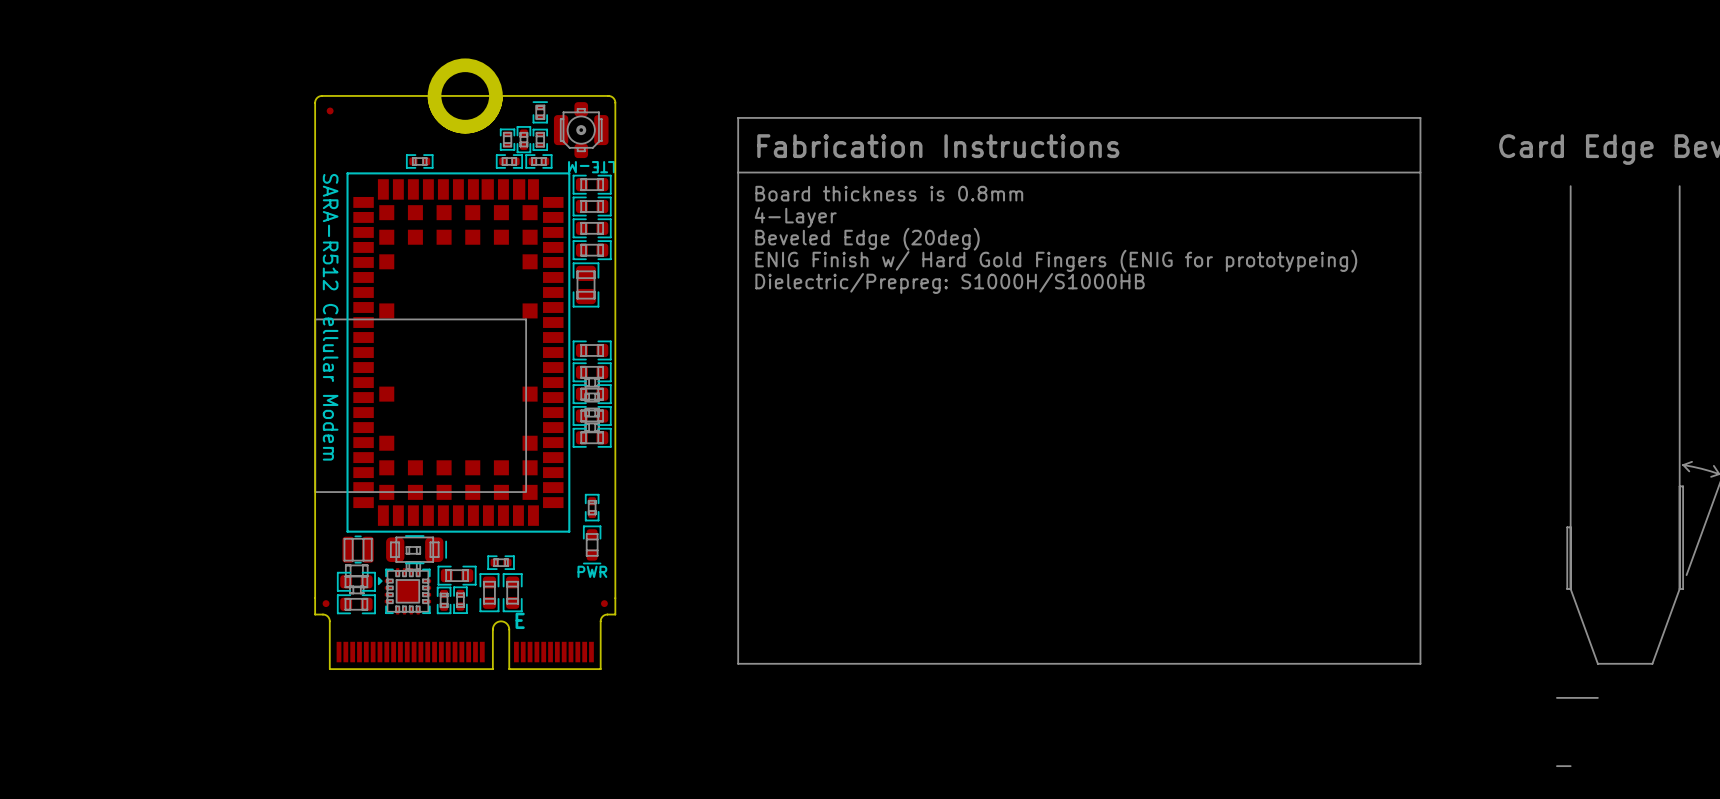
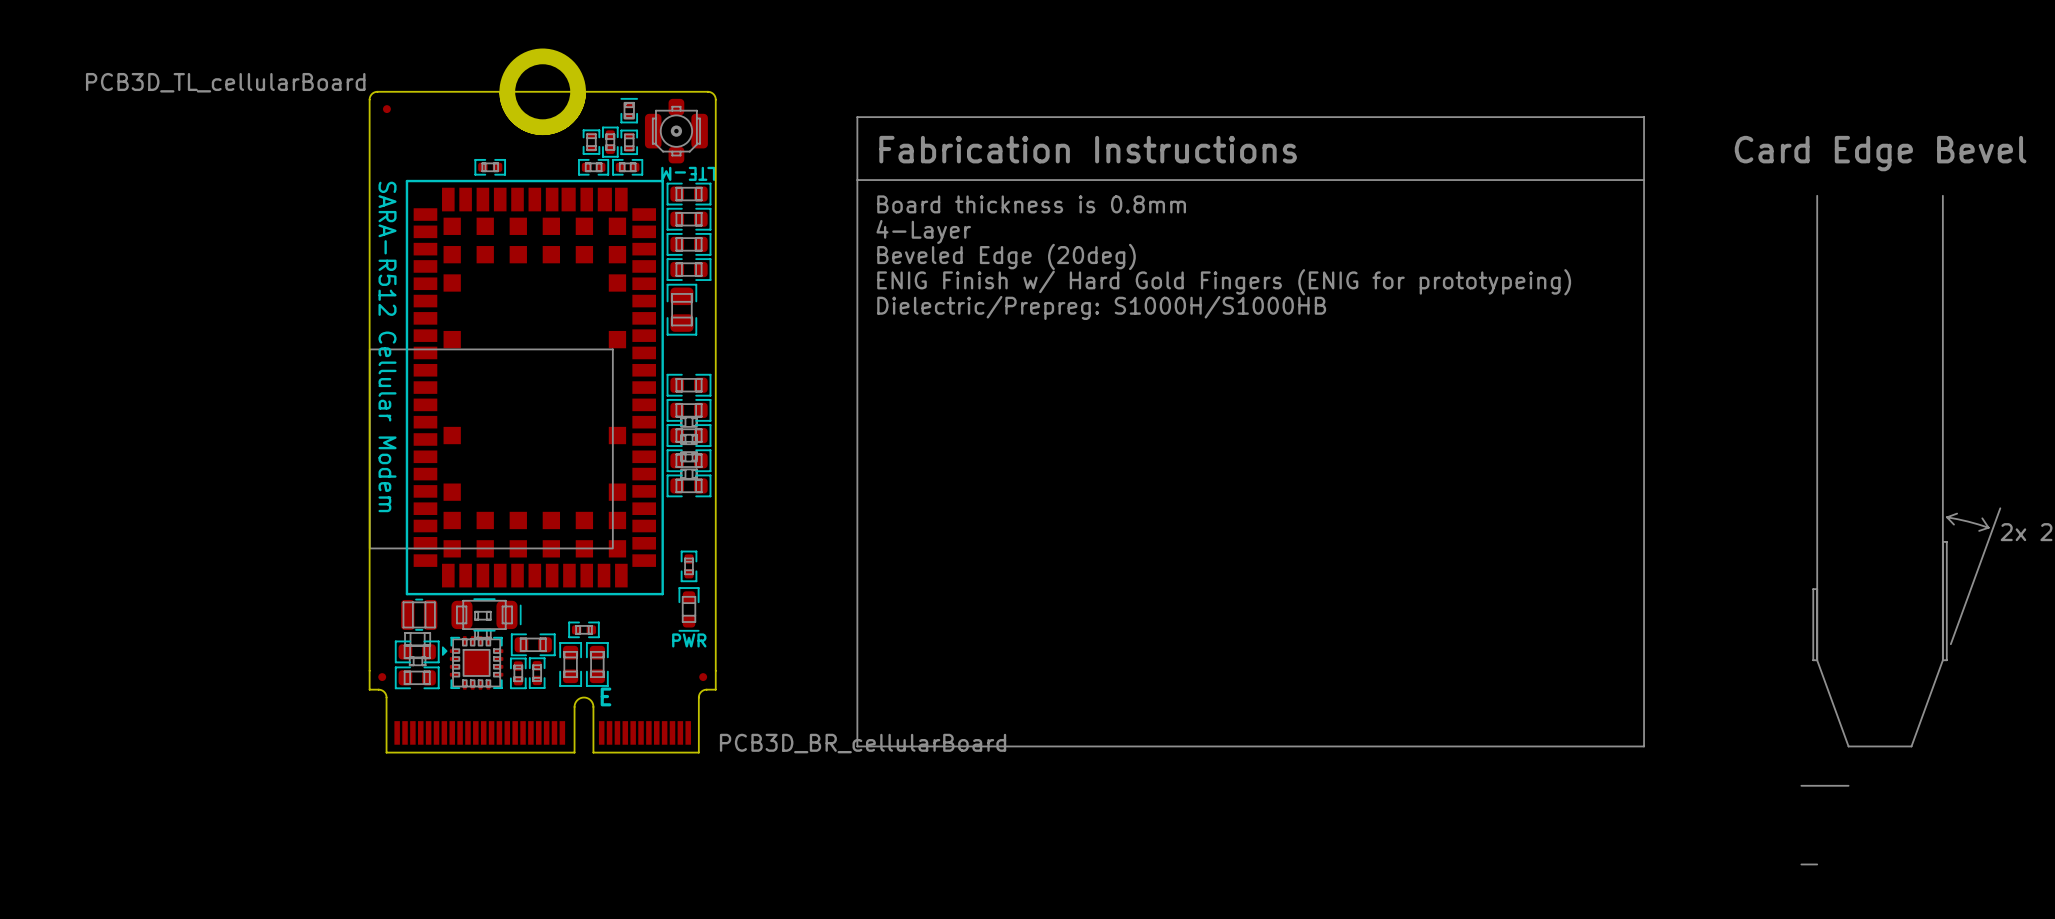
text: none -> PCB3D_TL_cellularBoard (225, 82)
text: none -> PCB3D_BR_cellularBoard (863, 743)

